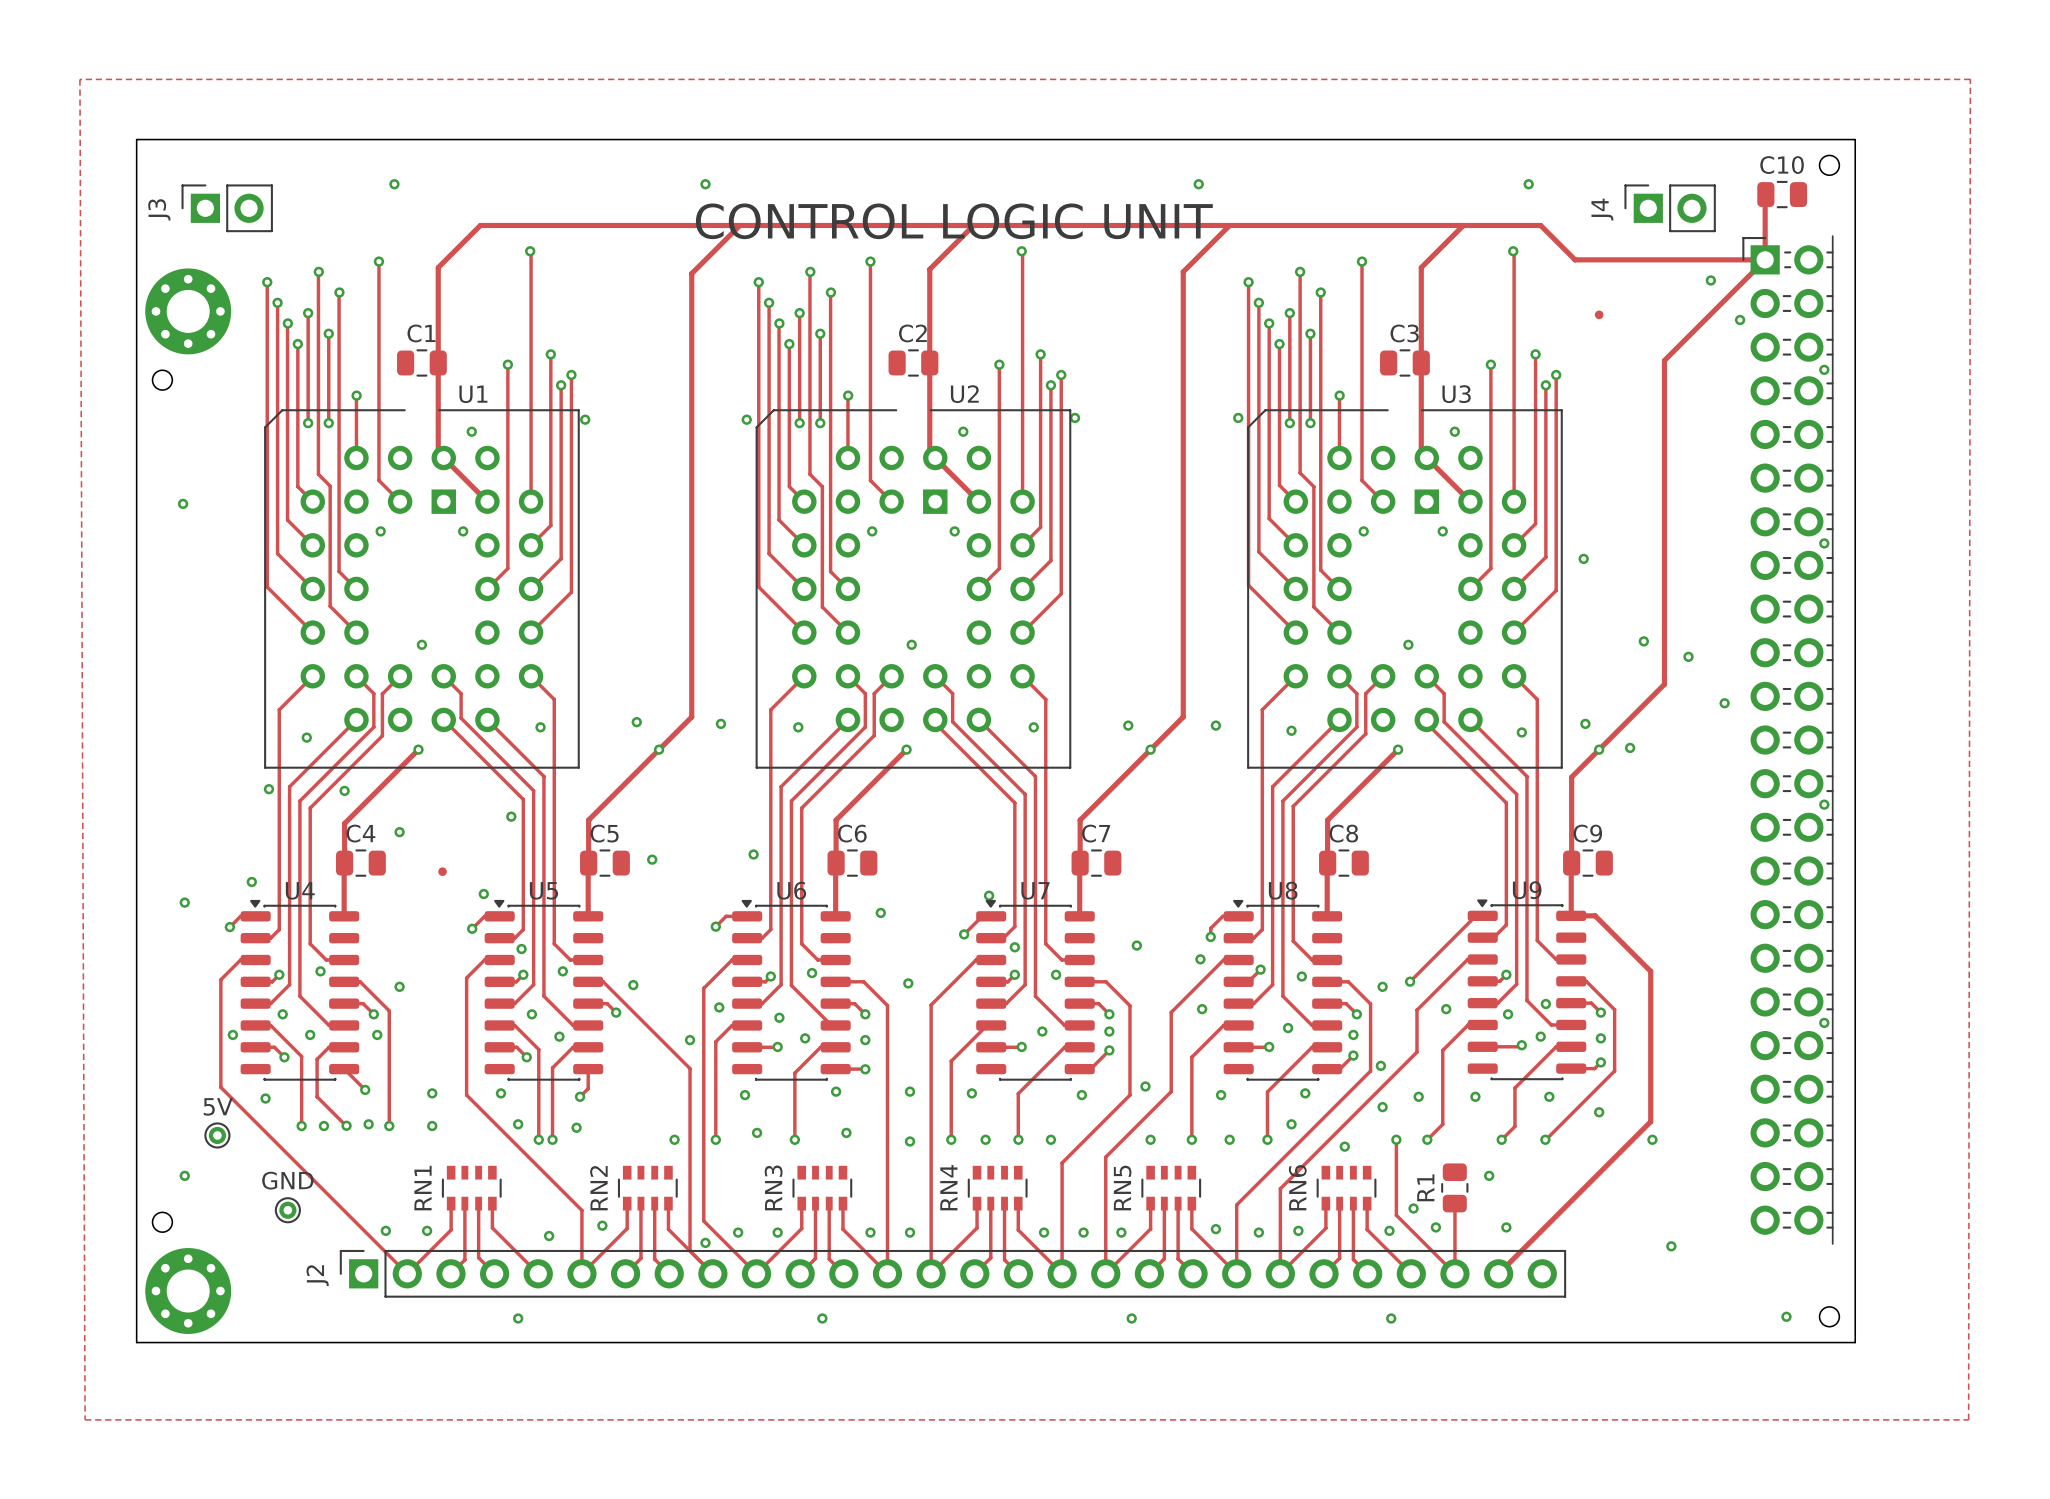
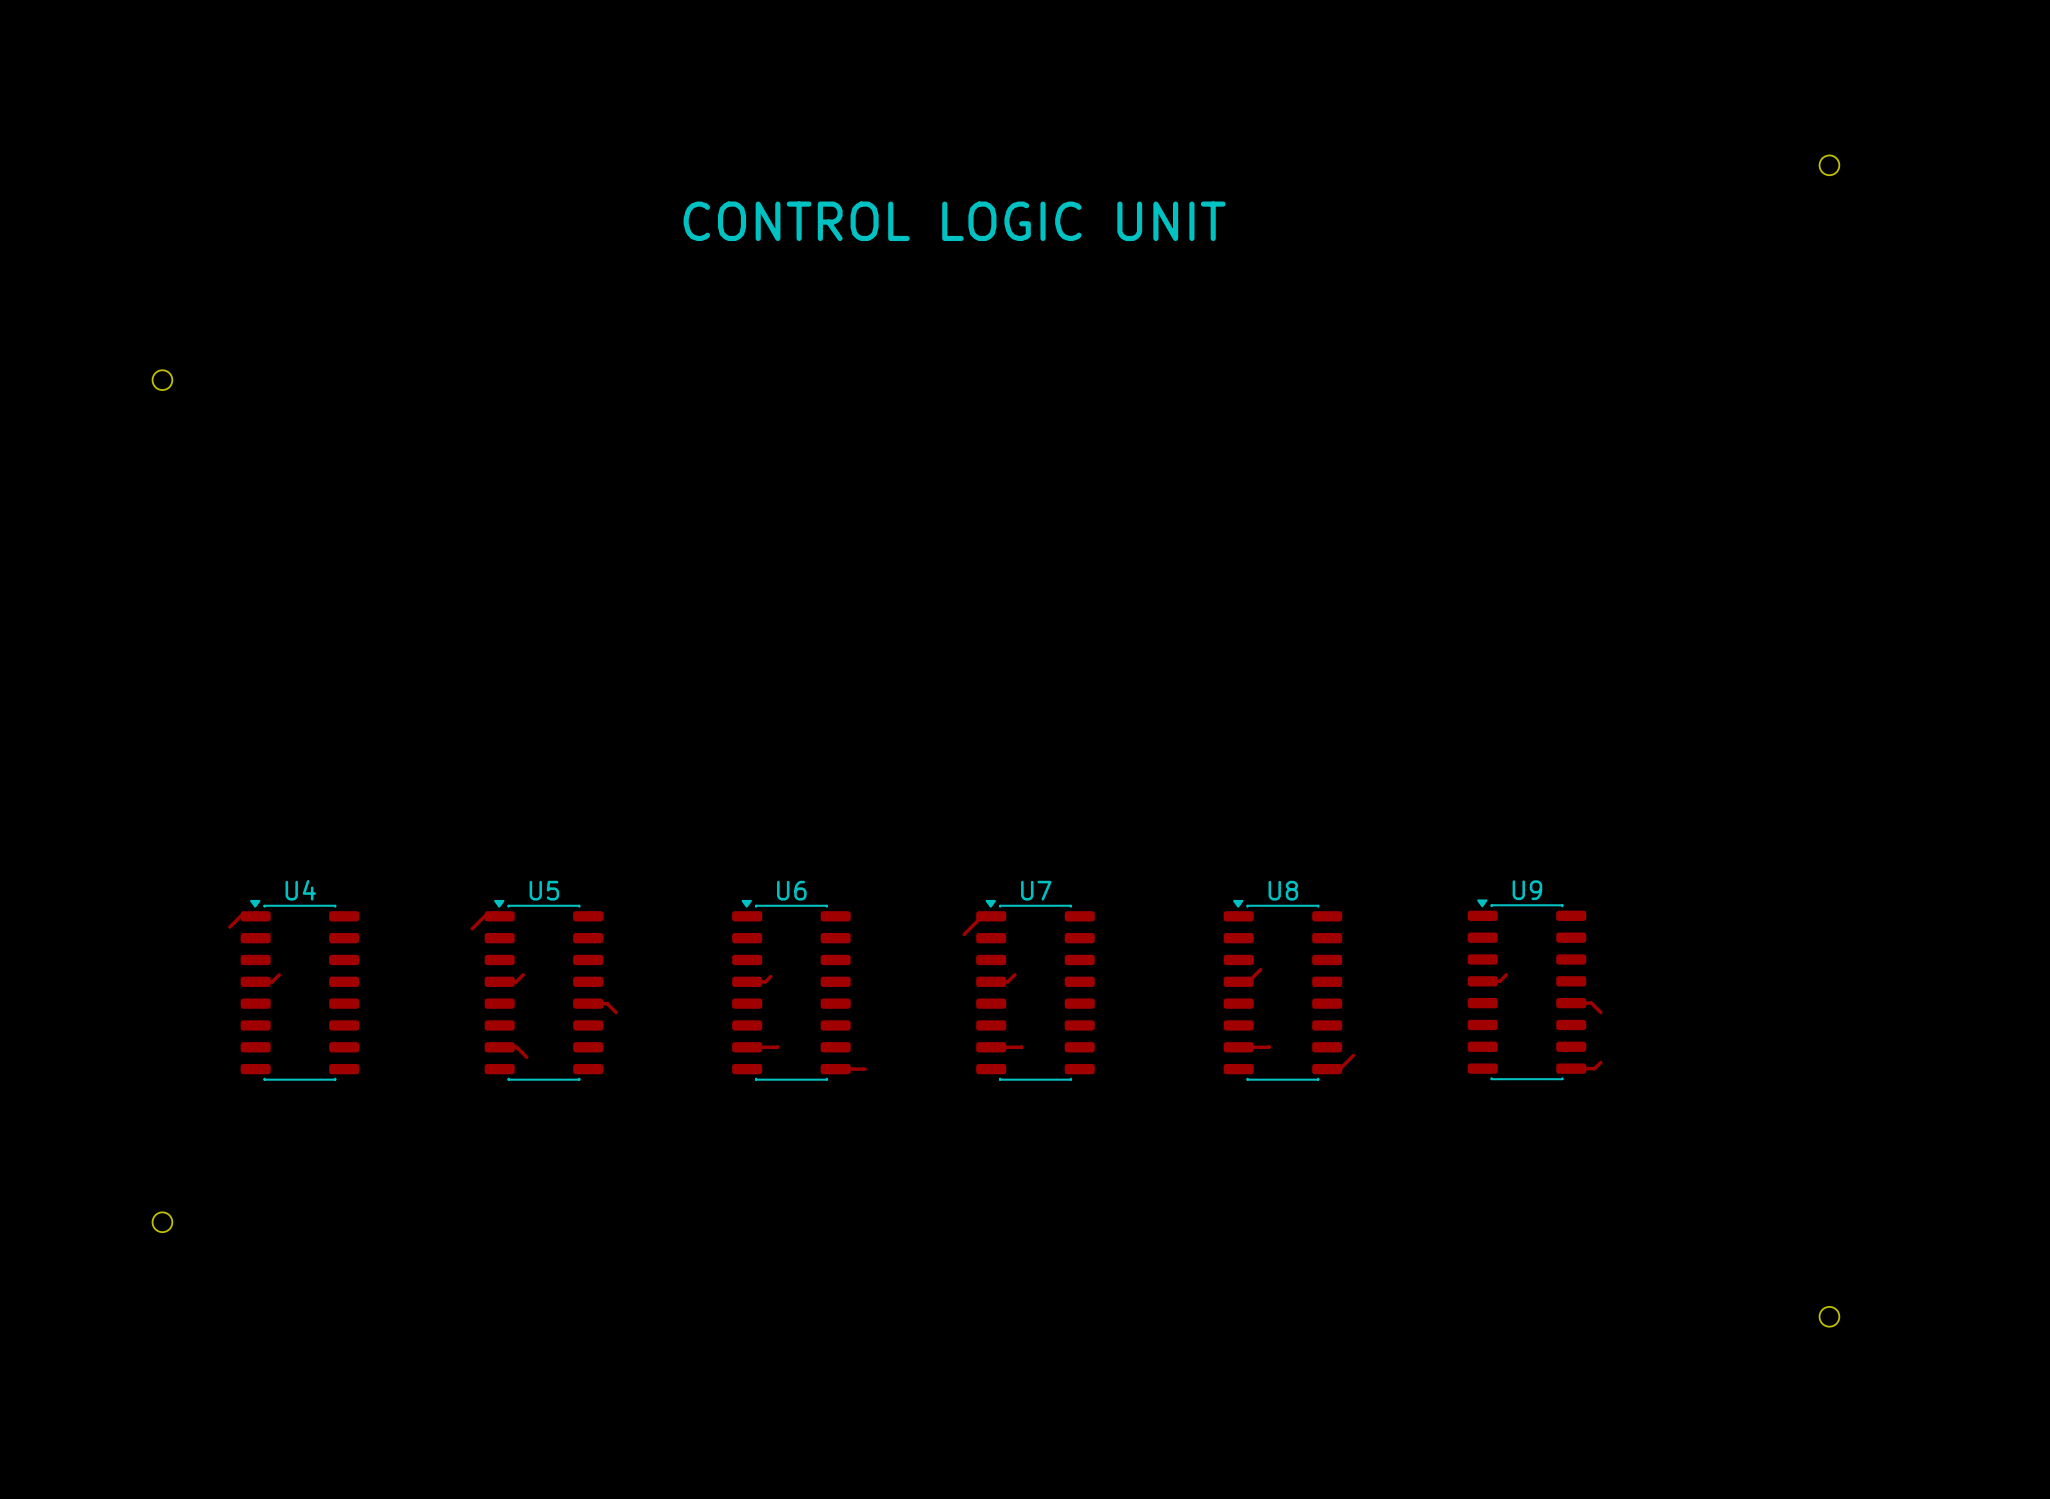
zone outline: (79, 79) (85, 1419) (1968, 1419) (1970, 79) (79, 79) -> none
board edge: (136, 139) (1855, 139) (1855, 1342) (136, 1342) (136, 139) -> none
via: (394, 184) -> none
via: (705, 184) -> none
via: (1198, 184) -> none
via: (1528, 184) -> none
track: (1765, 194) (1765, 259) -> none
C10: (1782, 194) -> none
J3: (227, 208) -> none
J4: (1670, 208) -> none
track: (739, 225) (691, 273) (691, 717) (588, 820) (588, 916) -> none
track: (973, 225) (929, 269) (929, 452) (978, 501) -> none
track: (1229, 225) (1183, 271) (1183, 717) (1080, 820) (1079, 916) -> none
track: (1463, 225) (1421, 267) (1421, 452) (1470, 501) -> none
track: (530, 251) (531, 501) -> none
via: (530, 251) -> none
track: (1021, 251) (1022, 501) -> none
via: (1021, 251) -> none
track: (1513, 251) (1514, 501) -> none
via: (1513, 251) -> none
track: (1765, 259) (1664, 360) (1664, 684) (1571, 777) (1571, 915) (1595, 915) (1650, 971) (1650, 1121) (1498, 1273) -> none
track: (1765, 259) (1575, 259) (1540, 225) (480, 225) (438, 267) (438, 452) (487, 501) -> none
track: (378, 261) (378, 480) (400, 501) -> none
via: (378, 261) -> none
track: (870, 261) (870, 480) (891, 501) -> none
via: (870, 261) -> none
track: (1361, 261) (1361, 480) (1383, 501) -> none
via: (1361, 261) -> none
track: (318, 271) (318, 474) (330, 486) (330, 606) (356, 632) -> none
via: (318, 271) -> none
track: (810, 271) (809, 474) (822, 486) (822, 607) (847, 632) -> none
via: (810, 271) -> none
track: (1300, 271) (1300, 472) (1313, 486) (1313, 607) (1339, 632) -> none
via: (1300, 271) -> none
via: (1710, 280) -> none
track: (267, 282) (267, 587) (312, 632) -> none
via: (267, 282) -> none
track: (758, 282) (758, 587) (804, 632) -> none
via: (758, 282) -> none
track: (1248, 282) (1248, 585) (1295, 632) -> none
via: (1248, 282) -> none
track: (339, 292) (339, 571) (356, 588) -> none
via: (339, 292) -> none
track: (830, 292) (830, 571) (847, 588) -> none
via: (830, 292) -> none
track: (1320, 292) (1320, 570) (1339, 588) -> none
via: (1320, 292) -> none
track: (277, 302) (277, 553) (312, 588) -> none
via: (277, 302) -> none
track: (769, 302) (769, 553) (804, 588) -> none
via: (769, 302) -> none
track: (1258, 302) (1258, 552) (1295, 588) -> none
via: (1258, 302) -> none
part: (188, 311) -> none
track: (308, 313) (308, 423) -> none
via: (308, 313) -> none
track: (799, 313) (799, 423) -> none
via: (799, 313) -> none
track: (1289, 313) (1289, 423) -> none
via: (1289, 313) -> none
part: (1599, 314) -> none
via: (1740, 320) -> none
track: (287, 323) (287, 520) (312, 545) -> none
via: (287, 323) -> none
track: (779, 323) (779, 520) (804, 545) -> none
via: (779, 323) -> none
track: (1269, 323) (1269, 518) (1295, 545) -> none
via: (1269, 323) -> none
track: (328, 333) (328, 423) -> none
via: (328, 333) -> none
track: (820, 333) (820, 423) -> none
via: (820, 333) -> none
track: (1310, 333) (1310, 423) -> none
via: (1310, 333) -> none
track: (297, 344) (297, 486) (312, 501) -> none
via: (297, 344) -> none
track: (789, 344) (789, 486) (804, 501) -> none
via: (789, 344) -> none
track: (1279, 344) (1279, 485) (1295, 501) -> none
via: (1279, 344) -> none
track: (550, 354) (550, 525) (531, 545) -> none
via: (550, 354) -> none
track: (1040, 354) (1040, 527) (1022, 545) -> none
via: (1040, 354) -> none
track: (1535, 354) (1535, 523) (1514, 545) -> none
via: (1535, 354) -> none
C1: (421, 362) -> none
C2: (913, 362) -> none
C3: (1404, 362) -> none
track: (507, 364) (507, 568) (487, 588) -> none
via: (507, 364) -> none
track: (999, 364) (999, 568) (978, 588) -> none
via: (999, 364) -> none
track: (1490, 364) (1490, 568) (1470, 588) -> none
via: (1490, 364) -> none
via: (1824, 369) -> none
track: (571, 375) (571, 592) (531, 632) -> none
via: (571, 375) -> none
track: (1061, 375) (1061, 593) (1022, 632) -> none
via: (1061, 375) -> none
track: (1556, 375) (1556, 590) (1514, 632) -> none
via: (1556, 375) -> none
track: (561, 385) (561, 558) (531, 588) -> none
via: (561, 385) -> none
track: (1050, 385) (1050, 560) (1022, 588) -> none
via: (1050, 385) -> none
track: (1545, 385) (1545, 557) (1514, 588) -> none
via: (1545, 385) -> none
track: (356, 395) (356, 458) -> none
via: (356, 395) -> none
track: (847, 395) (847, 458) -> none
via: (848, 395) -> none
via: (1339, 395) -> none
track: (1339, 397) (1339, 458) -> none
via: (1074, 417) -> none
via: (1238, 417) -> none
via: (585, 419) -> none
via: (746, 419) -> none
via: (308, 423) -> none
via: (328, 423) -> none
via: (799, 423) -> none
via: (820, 423) -> none
via: (1289, 423) -> none
via: (1310, 423) -> none
via: (471, 431) -> none
via: (963, 431) -> none
via: (1454, 431) -> none
via: (183, 503) -> none
via: (380, 531) -> none
via: (463, 531) -> none
via: (872, 531) -> none
via: (954, 531) -> none
via: (1363, 531) -> none
via: (1442, 531) -> none
via: (1824, 543) -> none
via: (1583, 558) -> none
U1: (421, 588) -> none
U2: (913, 588) -> none
U3: (1404, 588) -> none
via: (1643, 641) -> none
via: (421, 644) -> none
via: (911, 644) -> none
via: (1408, 644) -> none
via: (1688, 656) -> none
track: (312, 676) (279, 709) (279, 929) (270, 938) (255, 938) -> none
track: (356, 676) (373, 693) (373, 727) (299, 801) (299, 996) (329, 1025) (344, 1025) -> none
track: (400, 676) (382, 693) (382, 735) (310, 808) (310, 943) (326, 959) (344, 959) -> none
track: (443, 676) (461, 693) (461, 718) (533, 790) (533, 984) (514, 1003) (499, 1003) -> none
track: (531, 676) (554, 699) (554, 943) (570, 959) (588, 959) -> none
track: (804, 676) (770, 709) (770, 929) (762, 938) (747, 938) -> none
track: (847, 676) (865, 693) (865, 727) (791, 801) (791, 985) (831, 1025) (835, 1025) -> none
track: (891, 676) (874, 693) (874, 735) (801, 808) (801, 943) (817, 959) (835, 959) -> none
track: (935, 676) (952, 693) (952, 721) (1025, 794) (1025, 984) (1006, 1003) (991, 1003) -> none
track: (1022, 676) (1045, 699) (1045, 943) (1061, 959) (1079, 959) -> none
track: (1295, 676) (1262, 709) (1262, 929) (1253, 938) (1238, 938) -> none
track: (1339, 676) (1356, 693) (1356, 727) (1282, 801) (1282, 996) (1312, 1025) (1327, 1025) -> none
track: (1383, 676) (1365, 693) (1365, 733) (1293, 806) (1293, 941) (1312, 959) (1327, 959) -> none
track: (1426, 676) (1444, 693) (1444, 721) (1516, 794) (1516, 984) (1497, 1003) (1482, 1003) -> none
track: (1514, 676) (1537, 699) (1537, 940) (1556, 959) (1571, 959) -> none
via: (1724, 703) -> none
track: (356, 719) (289, 786) (289, 984) (270, 1003) (255, 1003) -> none
track: (443, 719) (523, 799) (523, 929) (514, 938) (499, 938) -> none
track: (487, 719) (543, 776) (543, 996) (573, 1025) (588, 1025) -> none
track: (847, 719) (781, 786) (781, 984) (762, 1003) (747, 1003) -> none
track: (935, 719) (935, 723) (1014, 802) (1014, 926) (1003, 938) (991, 938) -> none
track: (978, 719) (1035, 776) (1035, 996) (1064, 1025) (1079, 1025) -> none
track: (1339, 719) (1272, 786) (1272, 984) (1253, 1003) (1238, 1003) -> none
track: (1426, 719) (1426, 723) (1506, 802) (1506, 924) (1493, 937) (1482, 937) -> none
track: (1470, 719) (1526, 776) (1526, 1000) (1551, 1024) (1571, 1024) -> none
via: (636, 722) -> none
via: (720, 723) -> none
via: (1585, 723) -> none
via: (1128, 725) -> none
via: (1215, 725) -> none
via: (540, 727) -> none
via: (798, 727) -> none
via: (1033, 727) -> none
via: (1291, 730) -> none
via: (1521, 732) -> none
via: (306, 737) -> none
part: (1788, 740) -> none
via: (1630, 747) -> none
track: (418, 749) (344, 823) (344, 916) -> none
via: (418, 749) -> none
via: (659, 749) -> none
track: (906, 749) (836, 820) (835, 916) -> none
via: (906, 749) -> none
via: (1150, 749) -> none
track: (1398, 749) (1327, 820) (1327, 916) -> none
via: (1398, 749) -> none
via: (1599, 749) -> none
via: (268, 789) -> none
via: (344, 790) -> none
via: (1824, 804) -> none
via: (511, 816) -> none
via: (399, 832) -> none
via: (753, 854) -> none
via: (652, 859) -> none
C4: (360, 863) -> none
C5: (604, 863) -> none
C6: (852, 863) -> none
C7: (1096, 863) -> none
C8: (1343, 863) -> none
C9: (1587, 863) -> none
part: (442, 871) -> none
via: (251, 881) -> none
via: (483, 894) -> none
via: (989, 895) -> none
via: (184, 902) -> none
via: (880, 912) -> none
track: (1482, 915) (1475, 915) (1410, 981) -> none
track: (747, 916) (726, 916) (715, 926) -> none
track: (1238, 916) (1222, 916) (1210, 928) (1210, 936) -> none
via: (715, 926) -> none
via: (229, 927) -> none
via: (472, 928) -> none
via: (964, 934) -> none
via: (1210, 936) -> none
via: (1136, 945) -> none
via: (1014, 947) -> none
via: (521, 949) -> none
track: (255, 959) (240, 959) (220, 979) (220, 1087) (407, 1273) (451, 1229) (451, 1203) -> none
track: (499, 959) (484, 959) (466, 978) (466, 1095) (581, 1210) (581, 1273) (627, 1228) (627, 1203) -> none
track: (747, 959) (732, 959) (703, 988) (703, 1221) (756, 1273) (801, 1228) (801, 1203) -> none
track: (991, 959) (976, 959) (931, 1005) (931, 1273) (977, 1227) (977, 1203) -> none
via: (1200, 959) -> none
track: (1238, 959) (1223, 959) (1171, 1012) (1171, 1091) (1105, 1157) (1105, 1273) (1150, 1228) (1150, 1203) -> none
track: (1482, 959) (1467, 959) (1416, 1010) (1416, 1052) (1280, 1188) (1280, 1273) (1325, 1228) (1325, 1203) -> none
via: (1260, 969) -> none
via: (320, 971) -> none
via: (562, 971) -> none
via: (812, 973) -> none
via: (279, 974) -> none
via: (523, 974) -> none
via: (1014, 974) -> none
via: (1056, 974) -> none
via: (1506, 974) -> none
via: (770, 976) -> none
via: (1301, 976) -> none
track: (344, 981) (360, 981) (389, 1010) (389, 1126) -> none
track: (588, 981) (603, 981) (690, 1068) (690, 1250) -> none
track: (835, 981) (863, 981) (887, 1005) (887, 1273) (842, 1229) (842, 1203) -> none
track: (1079, 981) (1106, 981) (1129, 1005) (1129, 1095) (1062, 1162) (1062, 1273) (1018, 1229) (1018, 1203) -> none
track: (1327, 981) (1348, 981) (1370, 1004) (1370, 1071) (1236, 1204) (1236, 1273) (1191, 1228) (1191, 1203) -> none
via: (1410, 981) -> none
track: (1571, 981) (1586, 981) (1614, 1009) (1614, 1071) (1545, 1139) -> none
via: (908, 983) -> none
via: (633, 985) -> none
via: (399, 986) -> none
via: (1382, 986) -> none
track: (344, 1003) (363, 1003) (373, 1014) -> none
track: (835, 1003) (854, 1003) (865, 1014) -> none
track: (1079, 1003) (1098, 1003) (1109, 1014) -> none
track: (1327, 1003) (1346, 1003) (1356, 1014) -> none
via: (1545, 1004) -> none
via: (719, 1007) -> none
via: (1202, 1009) -> none
via: (1446, 1009) -> none
via: (616, 1012) -> none
via: (1600, 1012) -> none
via: (282, 1014) -> none
via: (373, 1014) -> none
via: (531, 1014) -> none
via: (865, 1014) -> none
via: (1109, 1014) -> none
via: (1356, 1014) -> none
via: (1508, 1014) -> none
via: (779, 1017) -> none
via: (1824, 1022) -> none
track: (1482, 1024) (1468, 1024) (1442, 1050) (1442, 1124) (1427, 1139) -> none
track: (255, 1025) (270, 1025) (301, 1056) (301, 1126) -> none
track: (499, 1025) (514, 1025) (538, 1049) (538, 1139) -> none
track: (747, 1025) (732, 1025) (715, 1041) (715, 1139) -> none
track: (991, 1025) (986, 1025) (951, 1061) (951, 1139) -> none
track: (1238, 1025) (1223, 1025) (1191, 1057) (1191, 1139) -> none
via: (1288, 1028) -> none
via: (1042, 1031) -> none
via: (1109, 1031) -> none
via: (232, 1034) -> none
via: (310, 1034) -> none
via: (377, 1034) -> none
via: (1353, 1034) -> none
via: (559, 1036) -> none
via: (1540, 1036) -> none
via: (805, 1038) -> none
via: (1600, 1038) -> none
via: (690, 1040) -> none
via: (865, 1040) -> none
track: (1521, 1045) (1482, 1046) -> none
via: (1521, 1045) -> none
via: (777, 1046) -> none
via: (1021, 1046) -> none
via: (1269, 1046) -> none
track: (1571, 1046) (1556, 1046) (1514, 1088) (1514, 1126) (1501, 1139) -> none
track: (255, 1047) (274, 1047) (284, 1057) -> none
track: (344, 1047) (329, 1047) (317, 1059) (317, 1096) (346, 1125) -> none
track: (588, 1047) (573, 1047) (552, 1067) (552, 1139) -> none
track: (835, 1047) (820, 1047) (794, 1073) (794, 1139) -> none
track: (1079, 1047) (1064, 1047) (1018, 1093) (1018, 1139) -> none
track: (1327, 1047) (1312, 1047) (1267, 1091) (1267, 1139) -> none
track: (1109, 1050) (1090, 1069) (1079, 1069) -> none
via: (1109, 1050) -> none
via: (1353, 1055) -> none
via: (284, 1057) -> none
via: (526, 1057) -> none
via: (1600, 1062) -> none
via: (1380, 1065) -> none
track: (344, 1069) (365, 1089) -> none
track: (588, 1069) (588, 1088) (580, 1096) -> none
via: (865, 1069) -> none
via: (1145, 1086) -> none
via: (365, 1089) -> none
via: (836, 1091) -> none
via: (910, 1091) -> none
via: (432, 1093) -> none
via: (500, 1093) -> none
via: (971, 1093) -> none
via: (1305, 1093) -> none
via: (745, 1095) -> none
via: (1081, 1095) -> none
via: (1221, 1095) -> none
via: (580, 1096) -> none
via: (1418, 1096) -> none
via: (1475, 1096) -> none
via: (1549, 1096) -> none
via: (265, 1098) -> none
text: 5V (218, 1106) -> none
via: (1382, 1107) -> none
via: (1599, 1112) -> none
via: (368, 1124) -> none
via: (518, 1124) -> none
via: (1291, 1124) -> none
via: (346, 1125) -> none
via: (301, 1126) -> none
via: (323, 1126) -> none
via: (389, 1126) -> none
via: (432, 1126) -> none
via: (576, 1127) -> none
via: (757, 1132) -> none
via: (846, 1132) -> none
part: (217, 1135) -> none
via: (538, 1139) -> none
via: (552, 1139) -> none
via: (674, 1139) -> none
via: (715, 1139) -> none
via: (794, 1139) -> none
via: (951, 1139) -> none
via: (985, 1139) -> none
via: (1018, 1139) -> none
via: (1050, 1139) -> none
via: (1150, 1139) -> none
via: (1191, 1139) -> none
via: (1229, 1139) -> none
via: (1267, 1139) -> none
track: (1396, 1139) (1396, 1215) (1454, 1273) (1454, 1203) -> none
via: (1396, 1139) -> none
via: (1427, 1139) -> none
via: (1501, 1139) -> none
via: (1545, 1139) -> none
via: (1652, 1139) -> none
via: (910, 1141) -> none
via: (1344, 1146) -> none
via: (184, 1175) -> none
via: (1489, 1175) -> none
text: GND (287, 1180) -> none
R1: (1454, 1187) -> none
RN1: (471, 1188) -> none
RN2: (647, 1188) -> none
RN3: (822, 1188) -> none
RN4: (997, 1188) -> none
RN5: (1171, 1188) -> none
RN6: (1346, 1188) -> none
track: (464, 1203) (464, 1259) (450, 1273) -> none
track: (478, 1203) (478, 1257) (494, 1273) -> none
track: (492, 1203) (492, 1227) (538, 1273) -> none
track: (640, 1203) (640, 1258) (625, 1273) -> none
track: (654, 1203) (654, 1259) (669, 1273) -> none
track: (668, 1203) (668, 1229) (712, 1273) -> none
track: (815, 1203) (815, 1258) (800, 1273) -> none
track: (829, 1203) (829, 1259) (843, 1273) -> none
track: (990, 1203) (990, 1257) (974, 1273) -> none
track: (1004, 1203) (1004, 1259) (1018, 1273) -> none
track: (1164, 1203) (1164, 1258) (1149, 1273) -> none
track: (1178, 1203) (1178, 1258) (1193, 1273) -> none
track: (1339, 1203) (1339, 1258) (1324, 1273) -> none
track: (1353, 1203) (1353, 1259) (1367, 1273) -> none
track: (1367, 1203) (1367, 1229) (1411, 1273) -> none
via: (1413, 1208) -> none
part: (287, 1210) -> none
via: (602, 1225) -> none
via: (1435, 1227) -> none
via: (1506, 1227) -> none
via: (1215, 1229) -> none
via: (385, 1230) -> none
via: (427, 1230) -> none
via: (1298, 1230) -> none
via: (1389, 1230) -> none
via: (738, 1232) -> none
via: (777, 1232) -> none
via: (870, 1232) -> none
via: (910, 1232) -> none
via: (1044, 1232) -> none
via: (1083, 1232) -> none
via: (1121, 1232) -> none
via: (1258, 1232) -> none
via: (549, 1236) -> none
via: (705, 1242) -> none
via: (1671, 1246) -> none
J2: (952, 1273) -> none
part: (188, 1291) -> none
via: (1786, 1316) -> none
via: (518, 1318) -> none
via: (822, 1318) -> none
via: (1131, 1318) -> none
via: (1391, 1318) -> none

